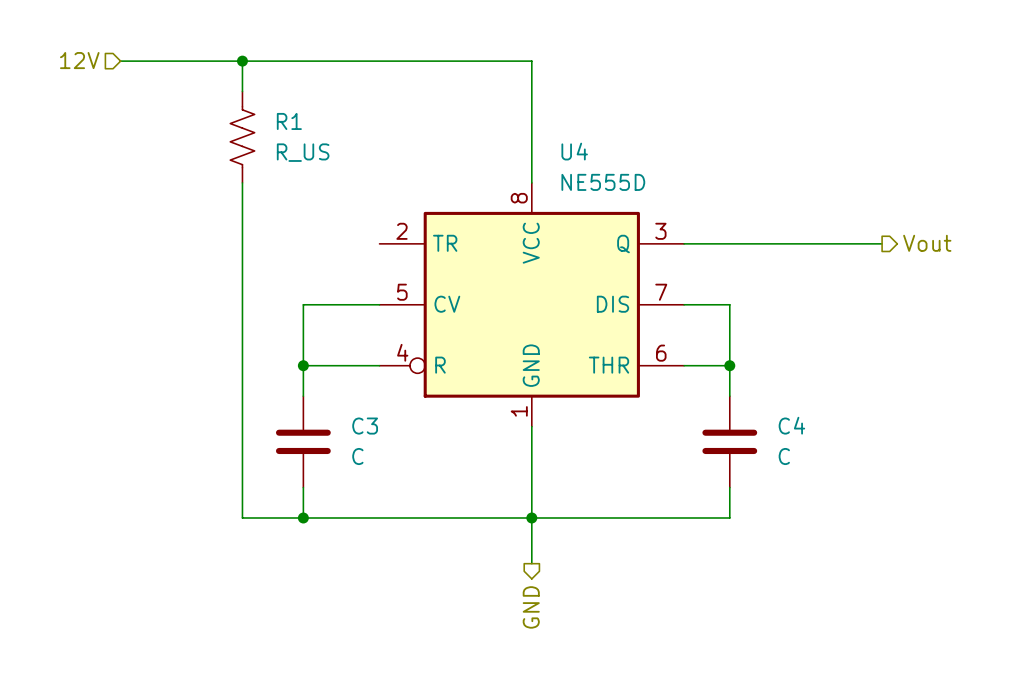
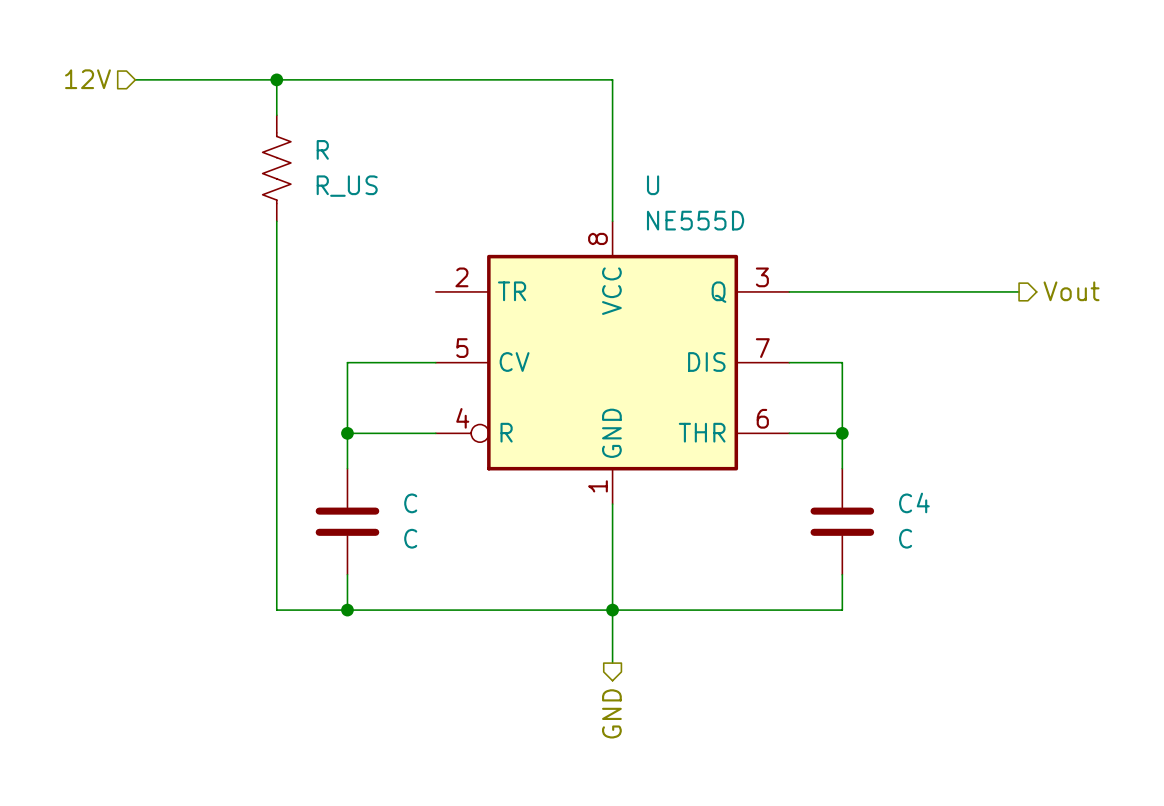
R1 name: R1 (289, 121) -> R (322, 149)
U4 name: U4 (574, 151) -> U (653, 185)
C3 name: C3 (365, 426) -> C (410, 503)

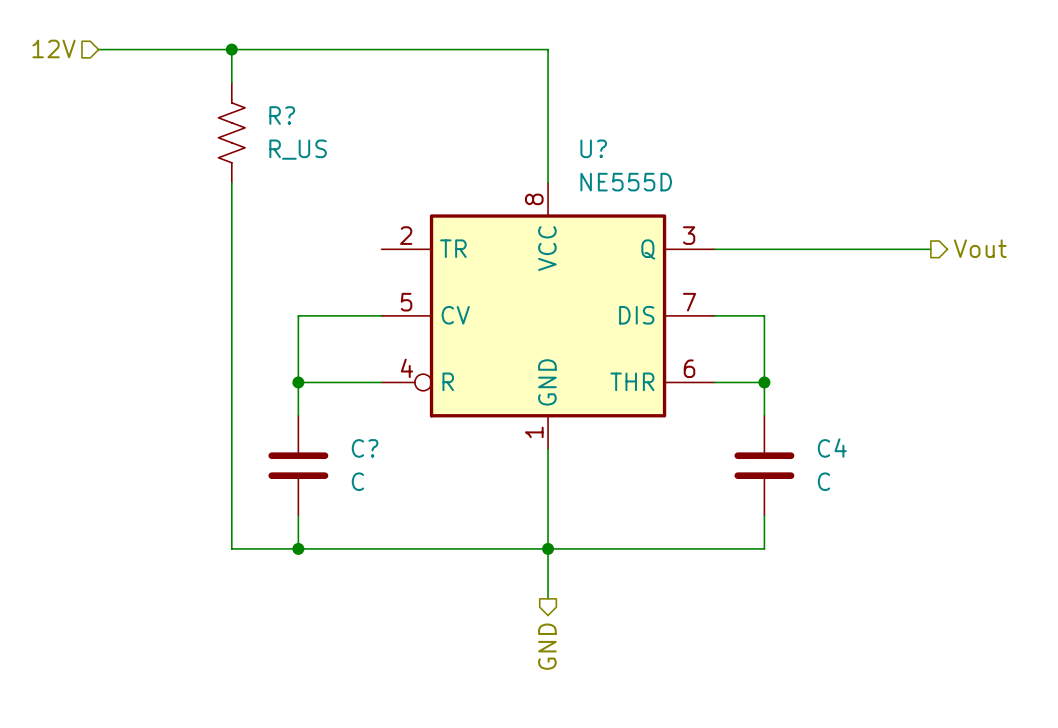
R name: R (322, 149) -> R? (282, 115)
U name: U (653, 185) -> U? (593, 148)
C name: C (410, 503) -> C? (365, 448)

